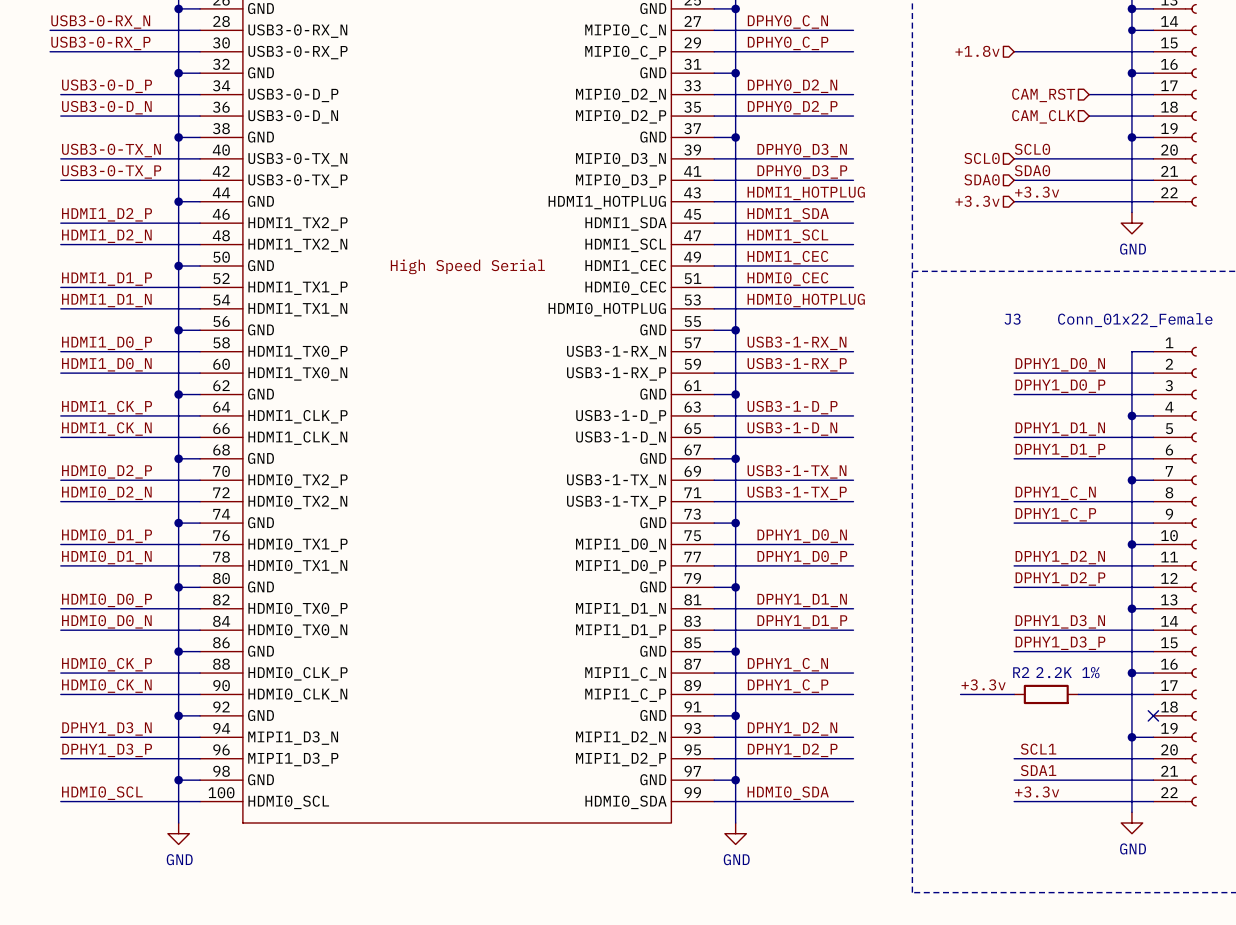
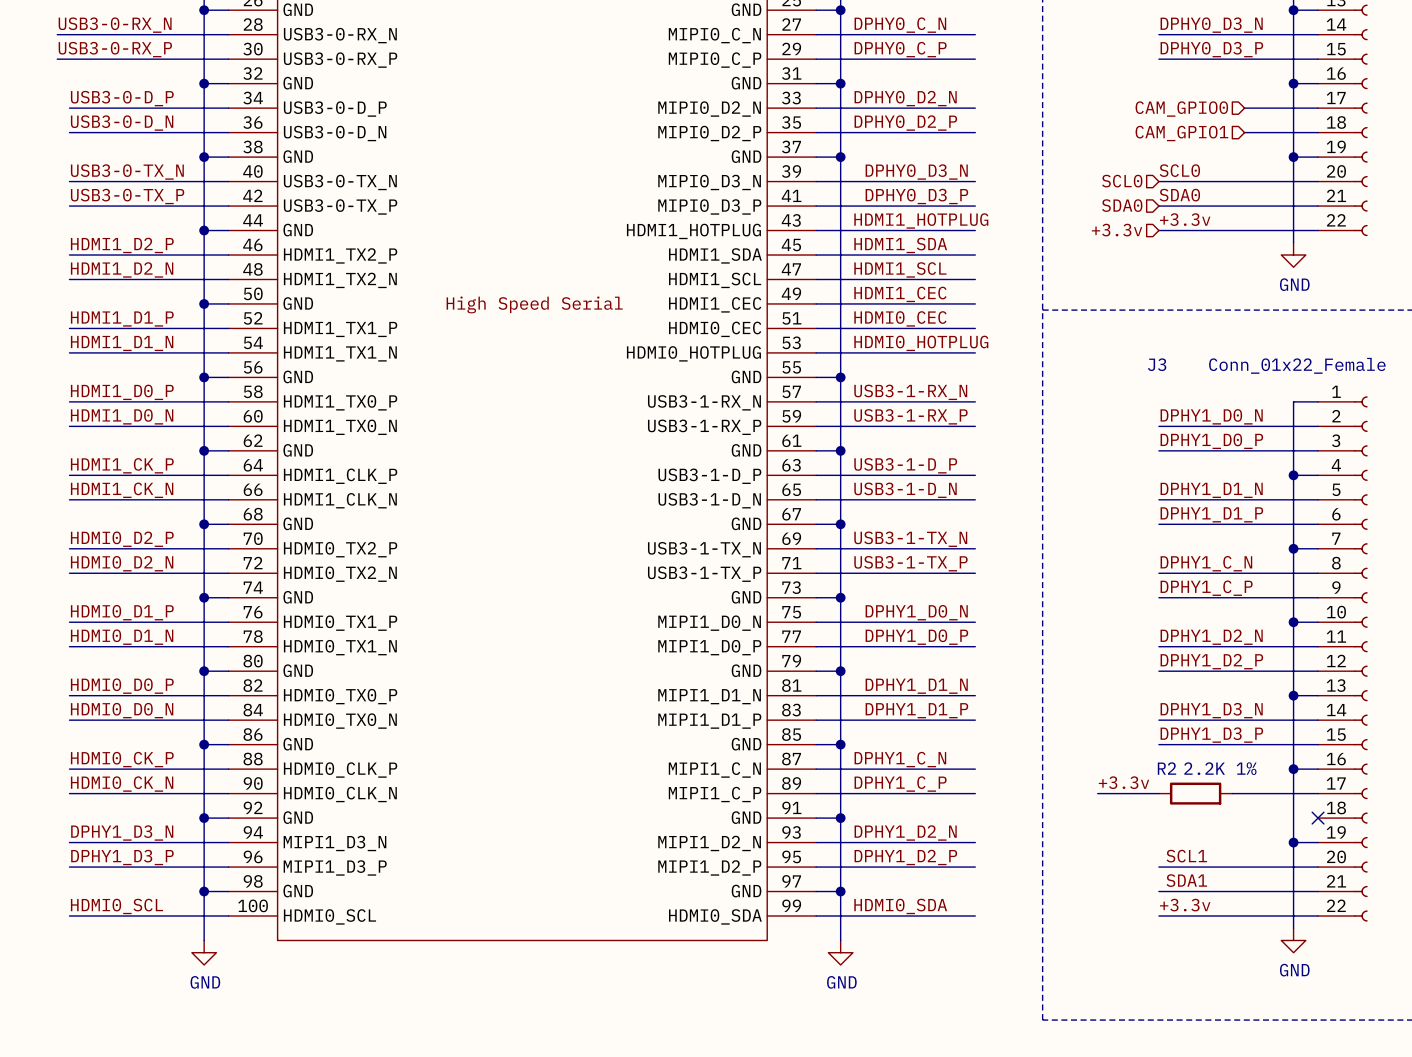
label: none -> DPHY0_D3_N (1211, 25)
wire: none -> (1158, 34) (1293, 34)
junction: (1131, 30) -> none
label: none -> DPHY0_D3_P (1211, 49)
hierarchical label: +1.8v (977, 51) -> none
hierarchical label: CAM_RST (1043, 95) -> CAM_GPIO0 (1181, 109)
hierarchical label: CAM_CLK (1043, 116) -> CAM_GPIO1 (1181, 133)

